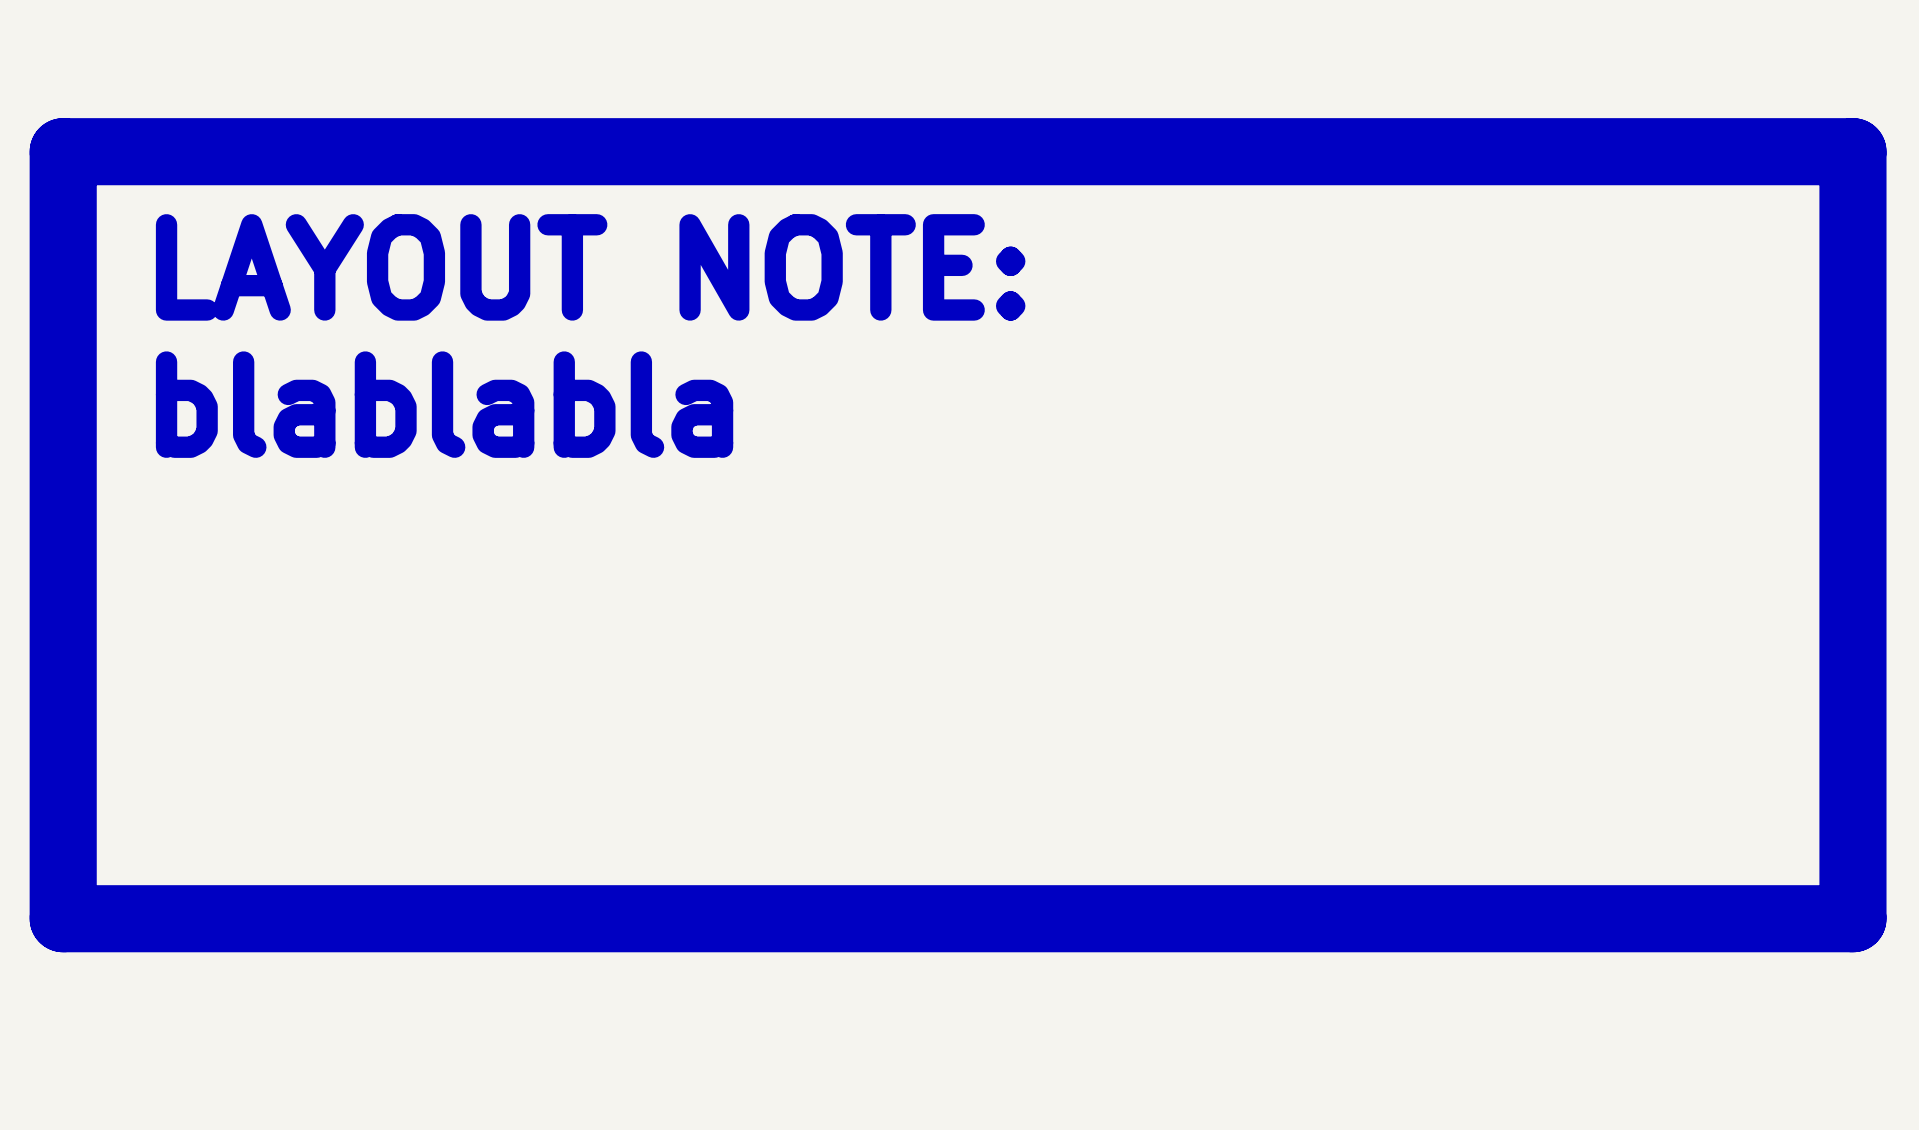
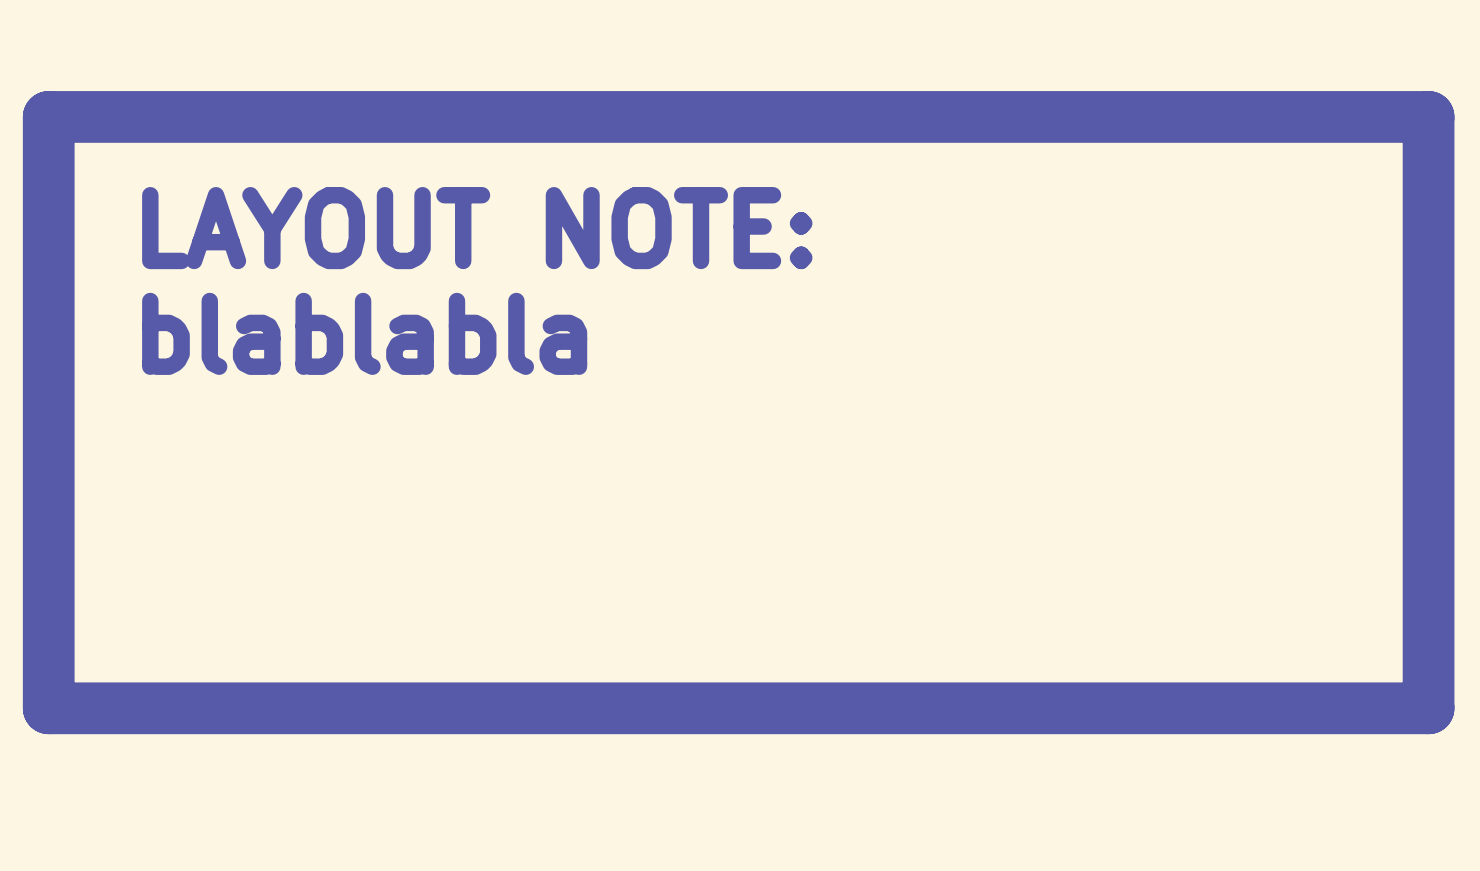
text position: LAYOUT NOTE: (590, 267) -> LAYOUT NOTE: (477, 228)
text position: blablabla (444, 404) -> blablabla (364, 333)

